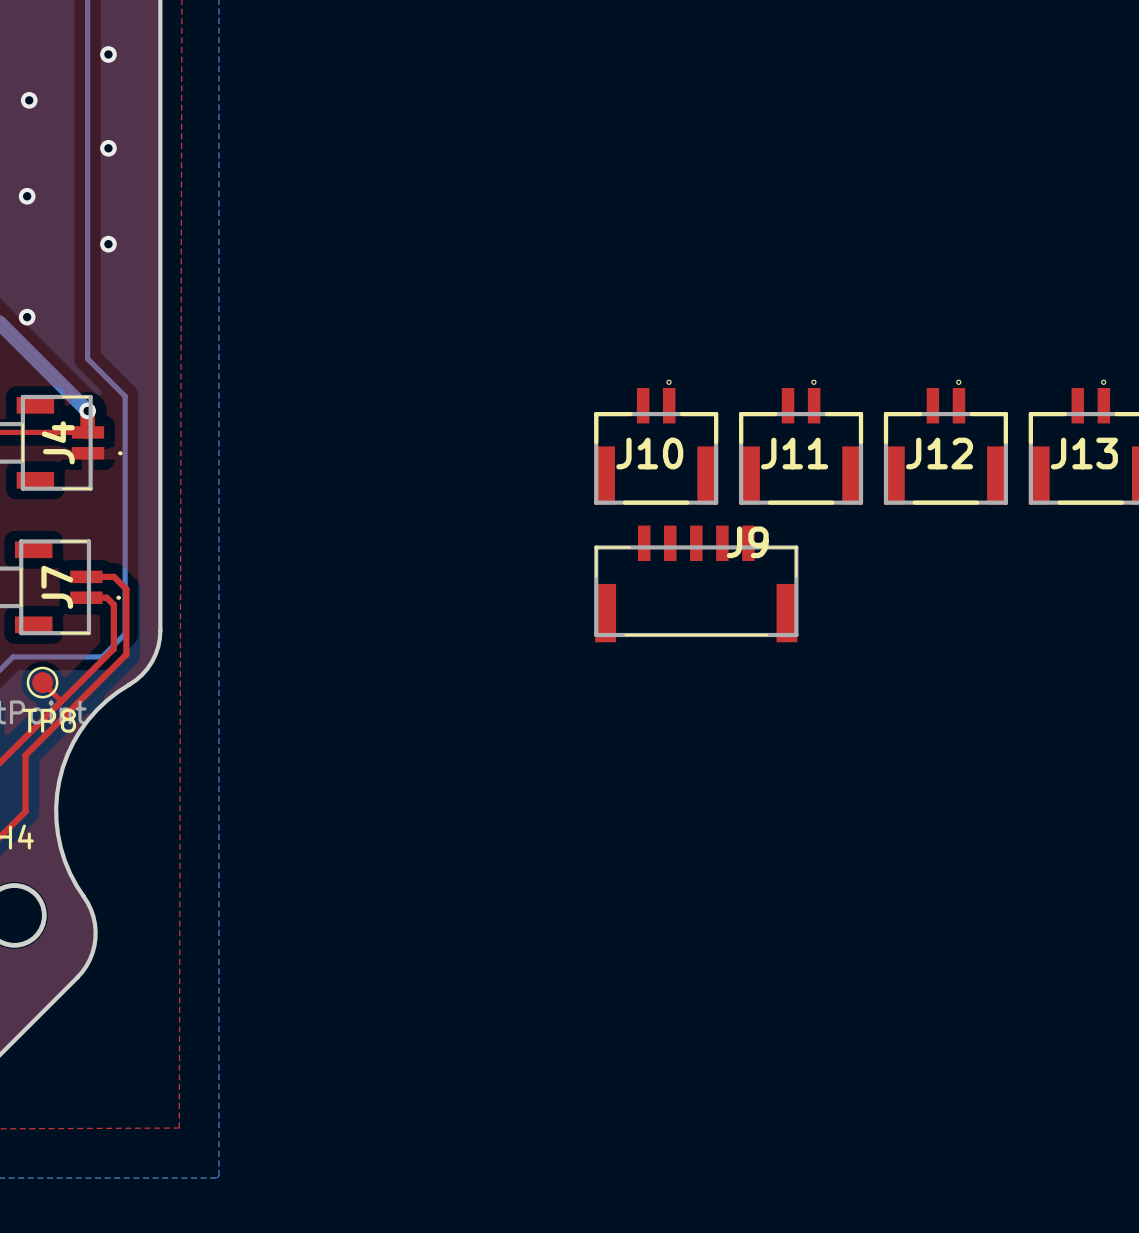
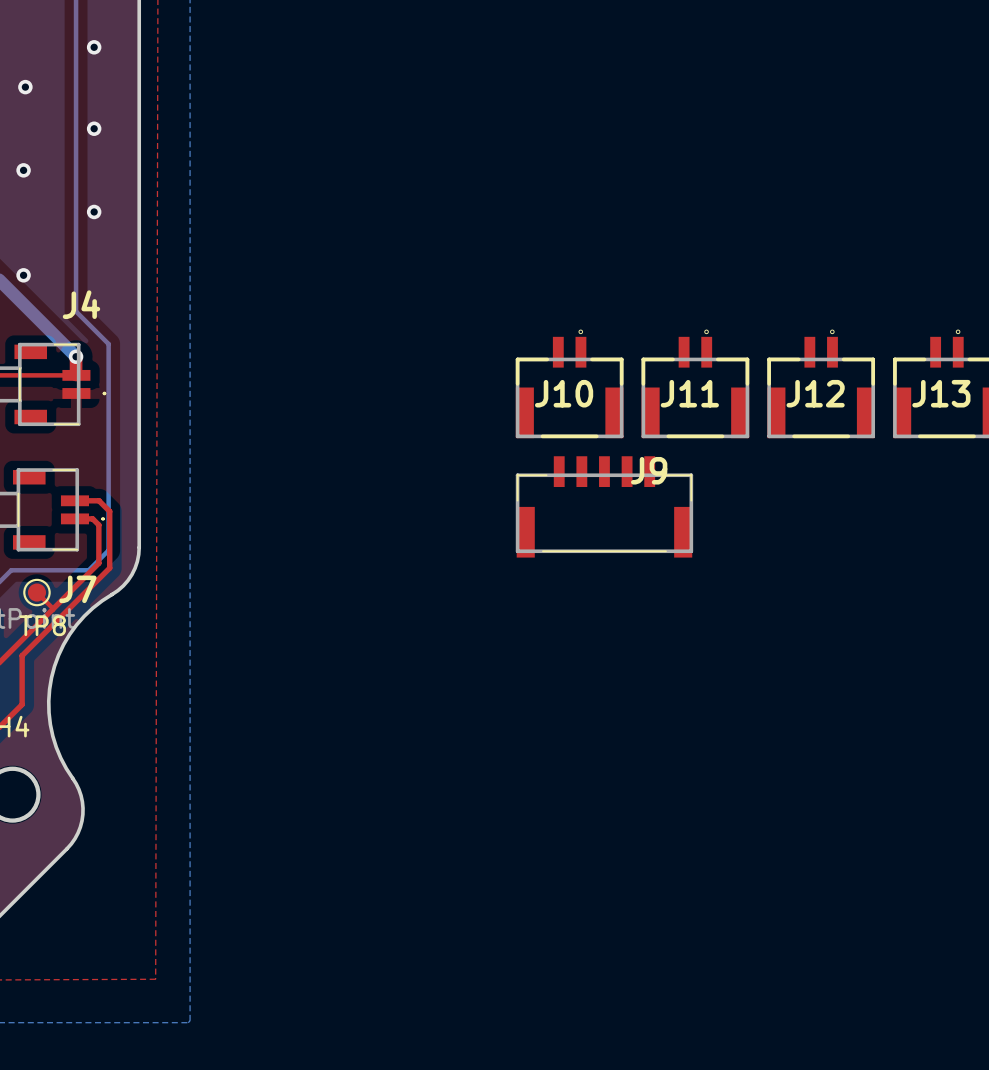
J4 name rotation: 0° (58, 442) -> 90° clockwise (81, 304)
J4 name position: J4 (58, 442) -> J4 (81, 304)
J7 name rotation: 0° (57, 587) -> 90° clockwise (77, 589)
J7 name position: J7 (57, 587) -> J7 (77, 589)

